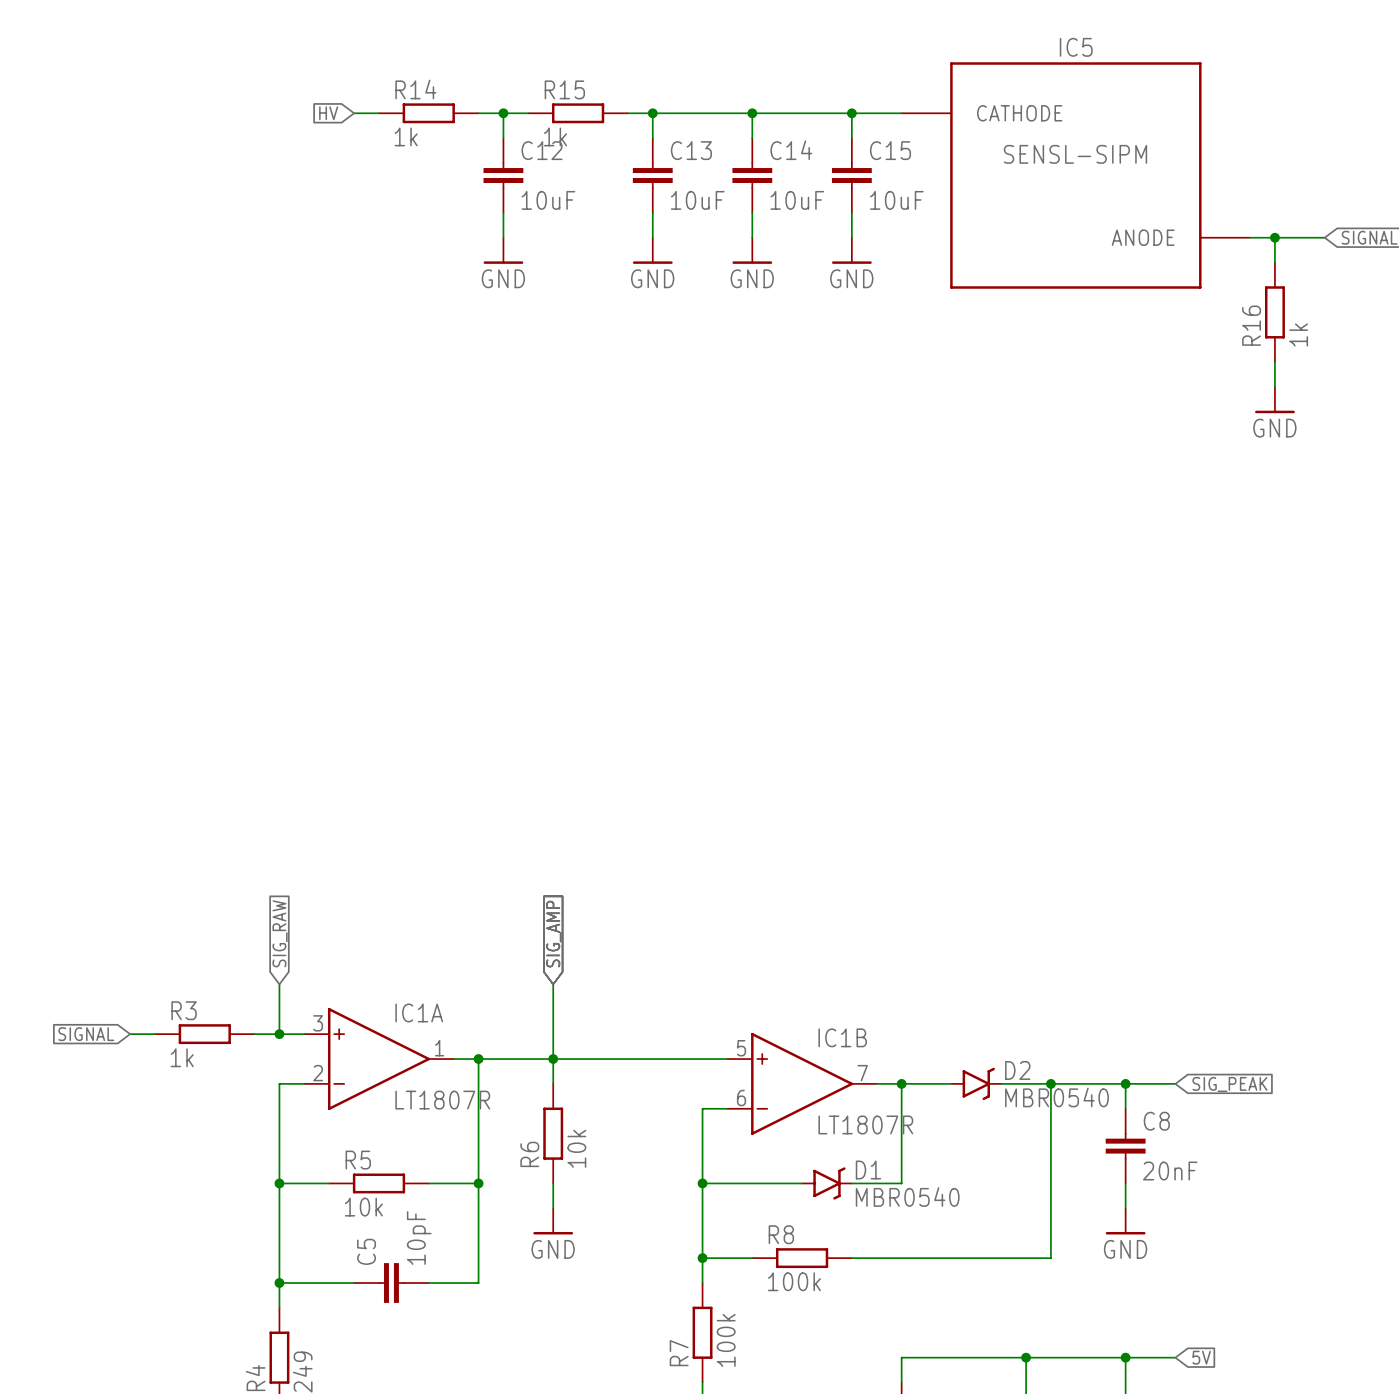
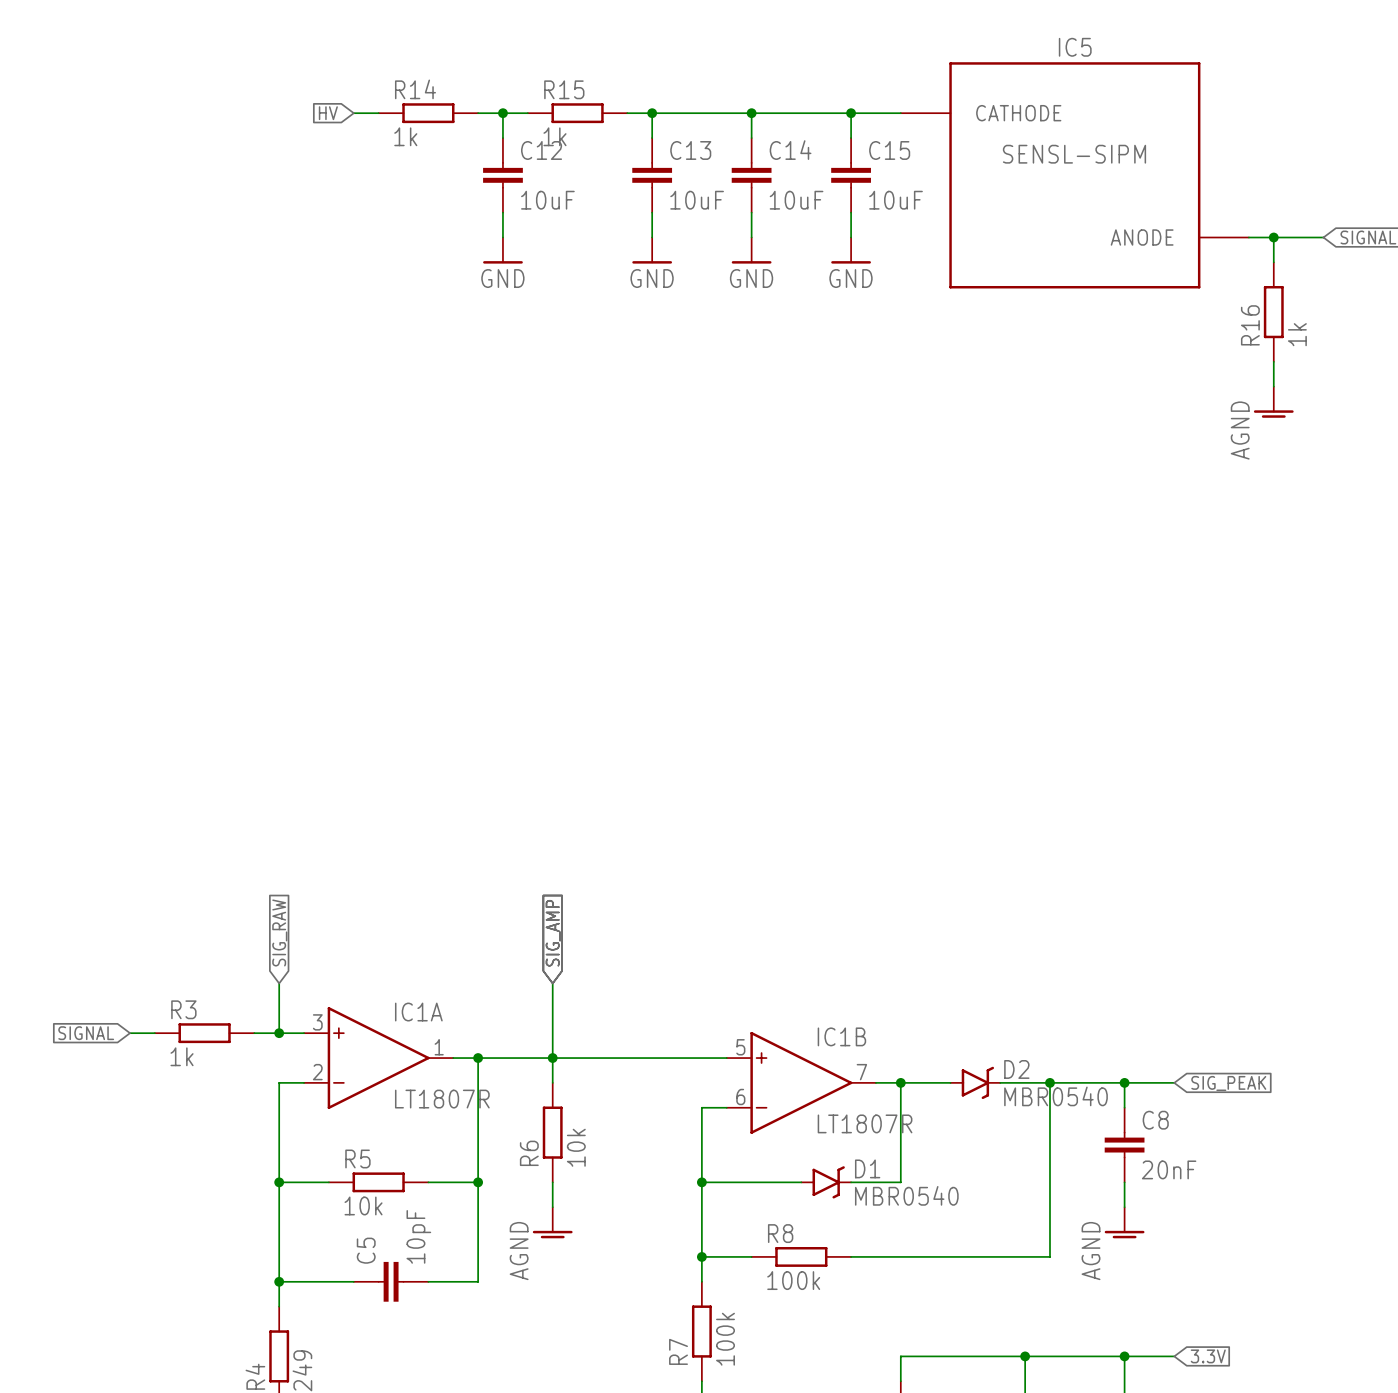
power symbol: GND (1274, 400) -> AGND (1273, 402)
power symbol: GND (553, 1221) -> AGND (552, 1222)
power symbol: GND (1125, 1221) -> AGND (1124, 1222)
global label: 5V (1201, 1357) -> 3.3V (1208, 1356)

